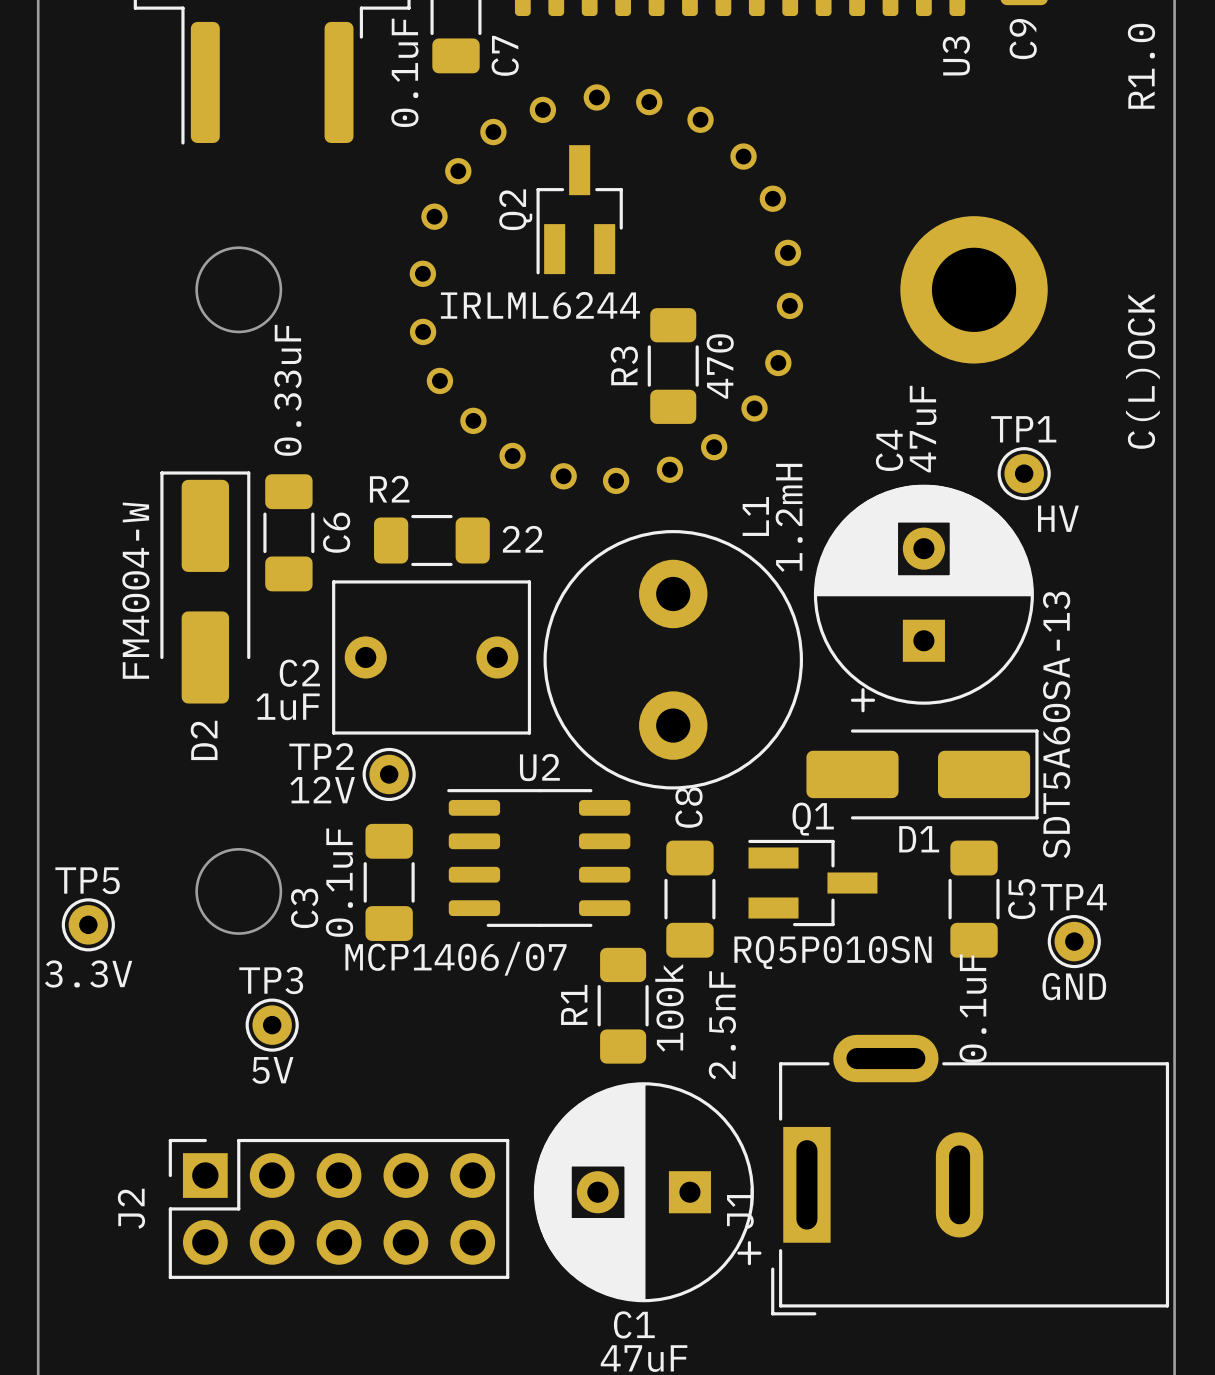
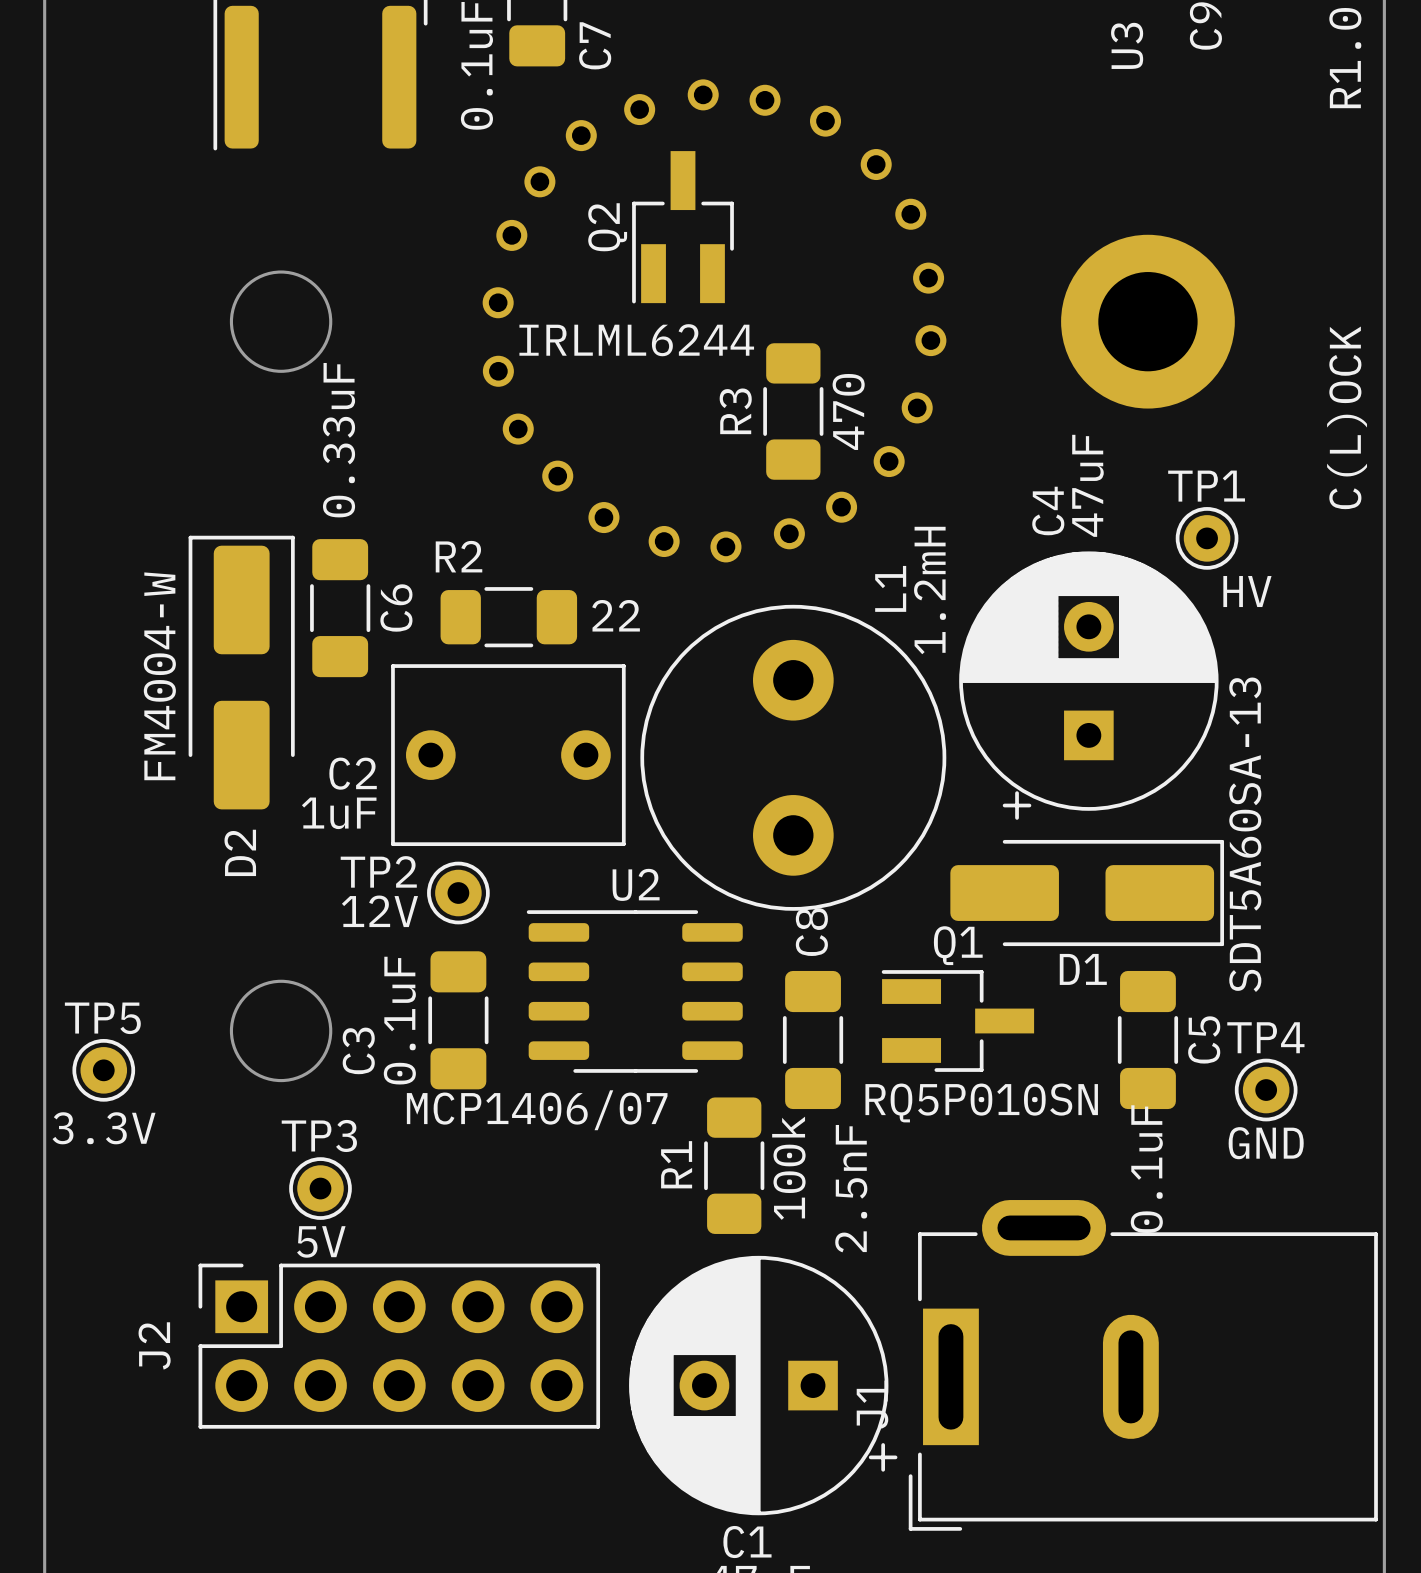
J2 position: (339, 1208) -> (399, 1346)

